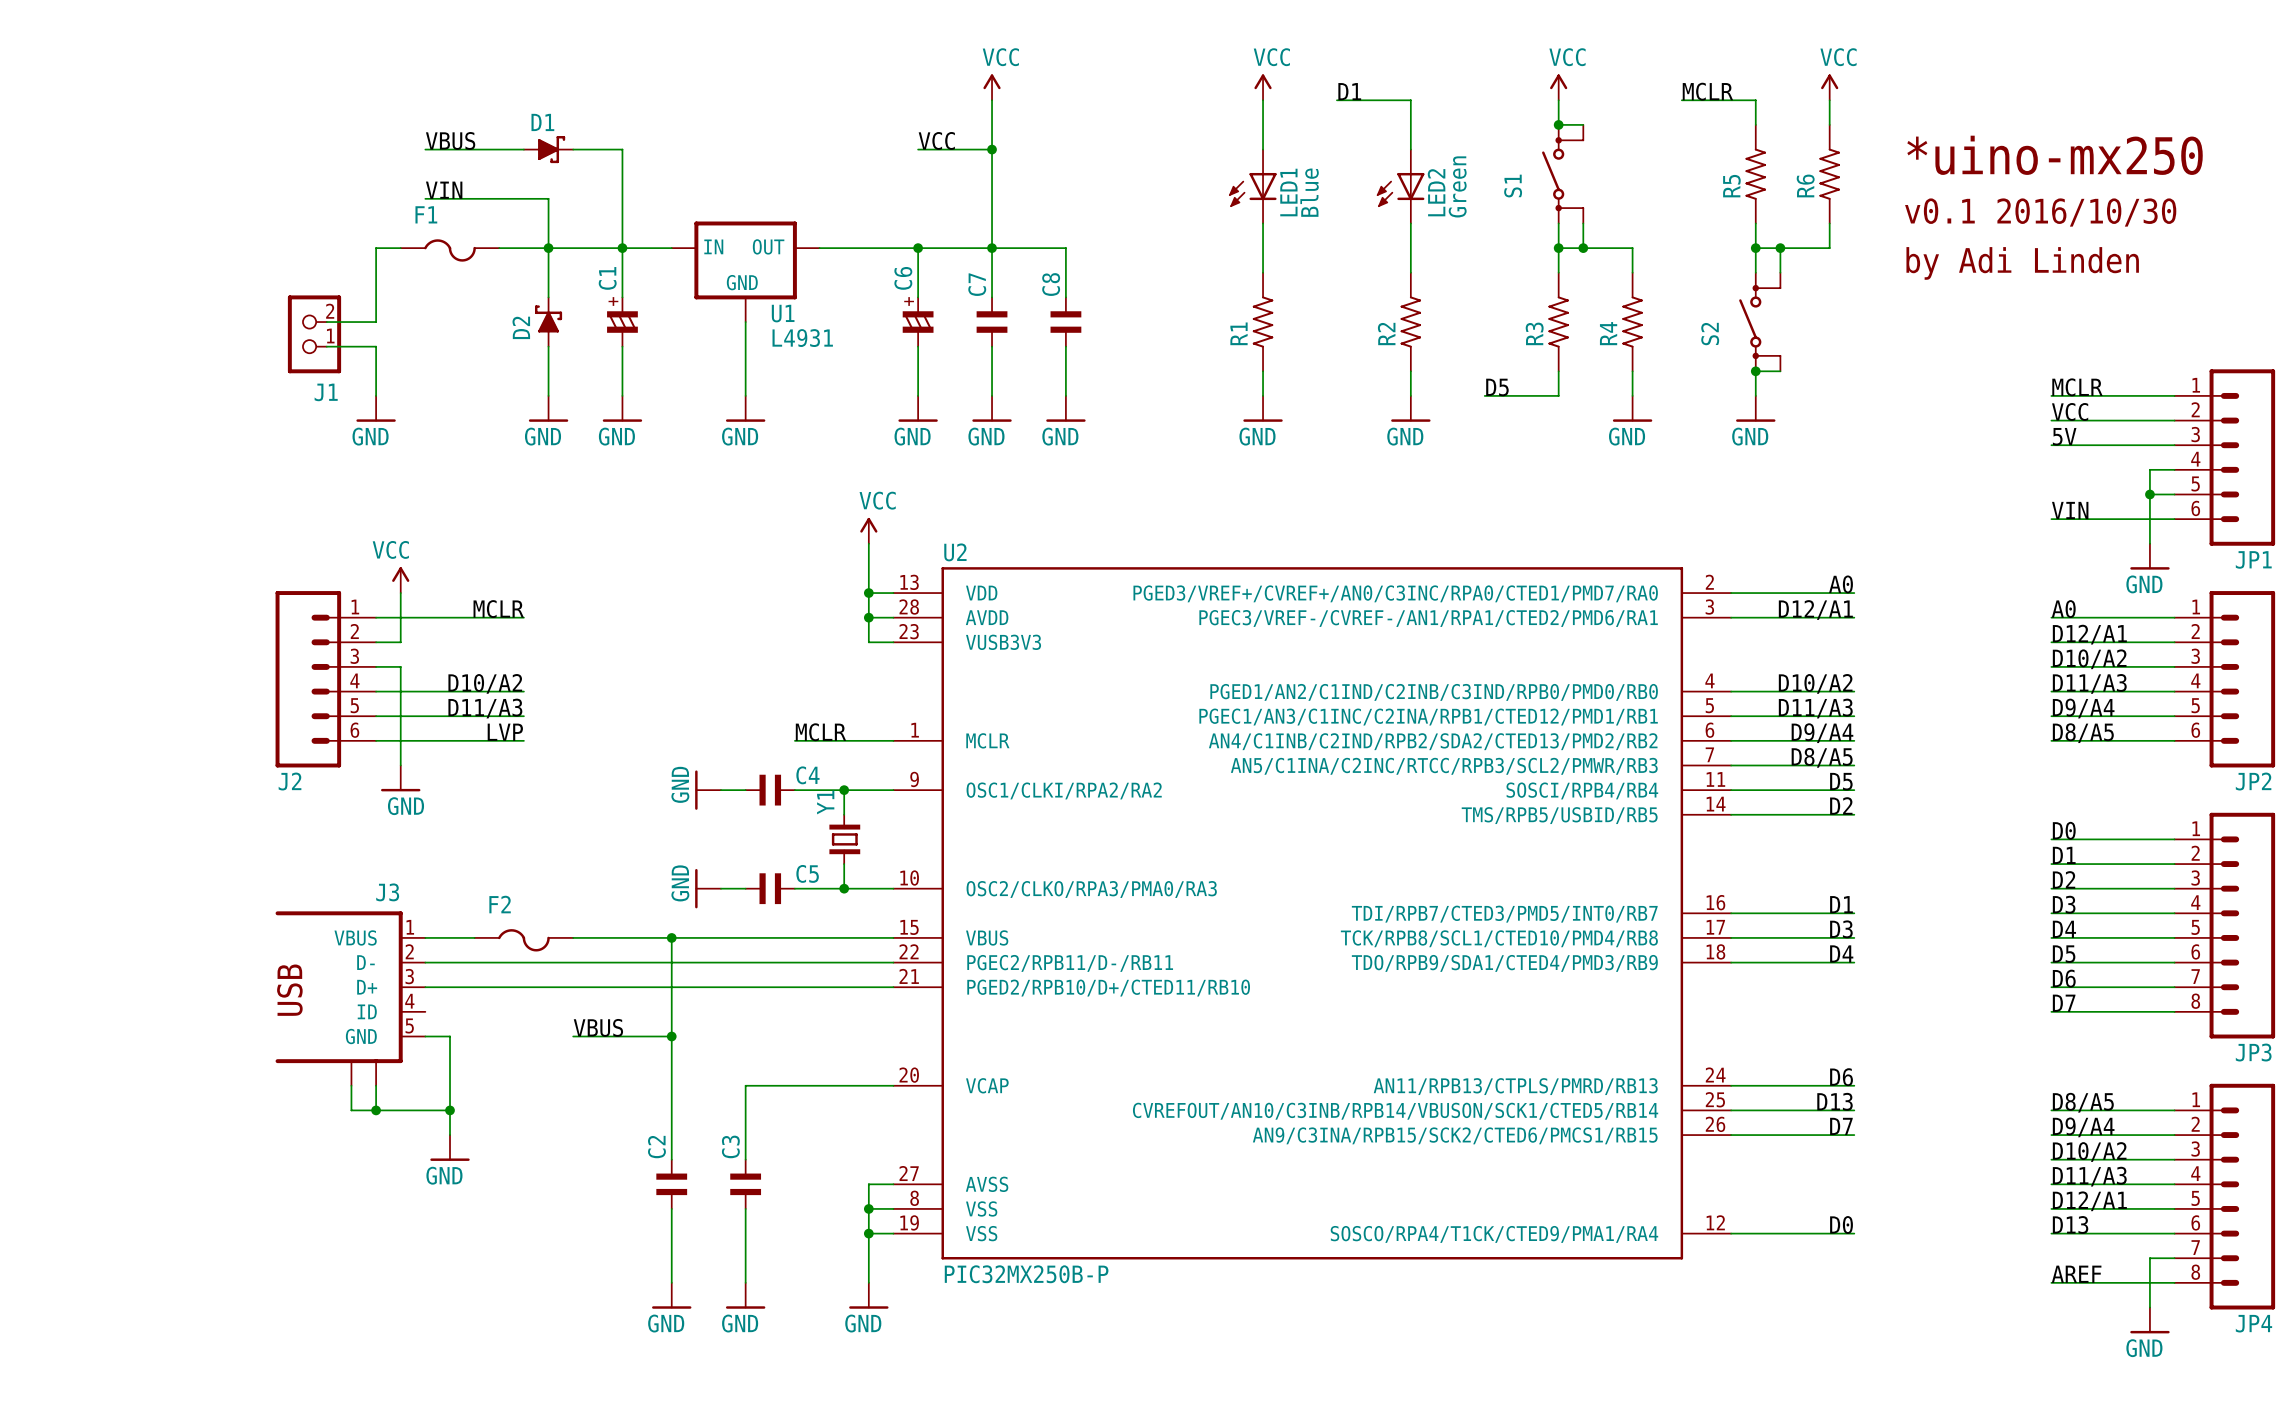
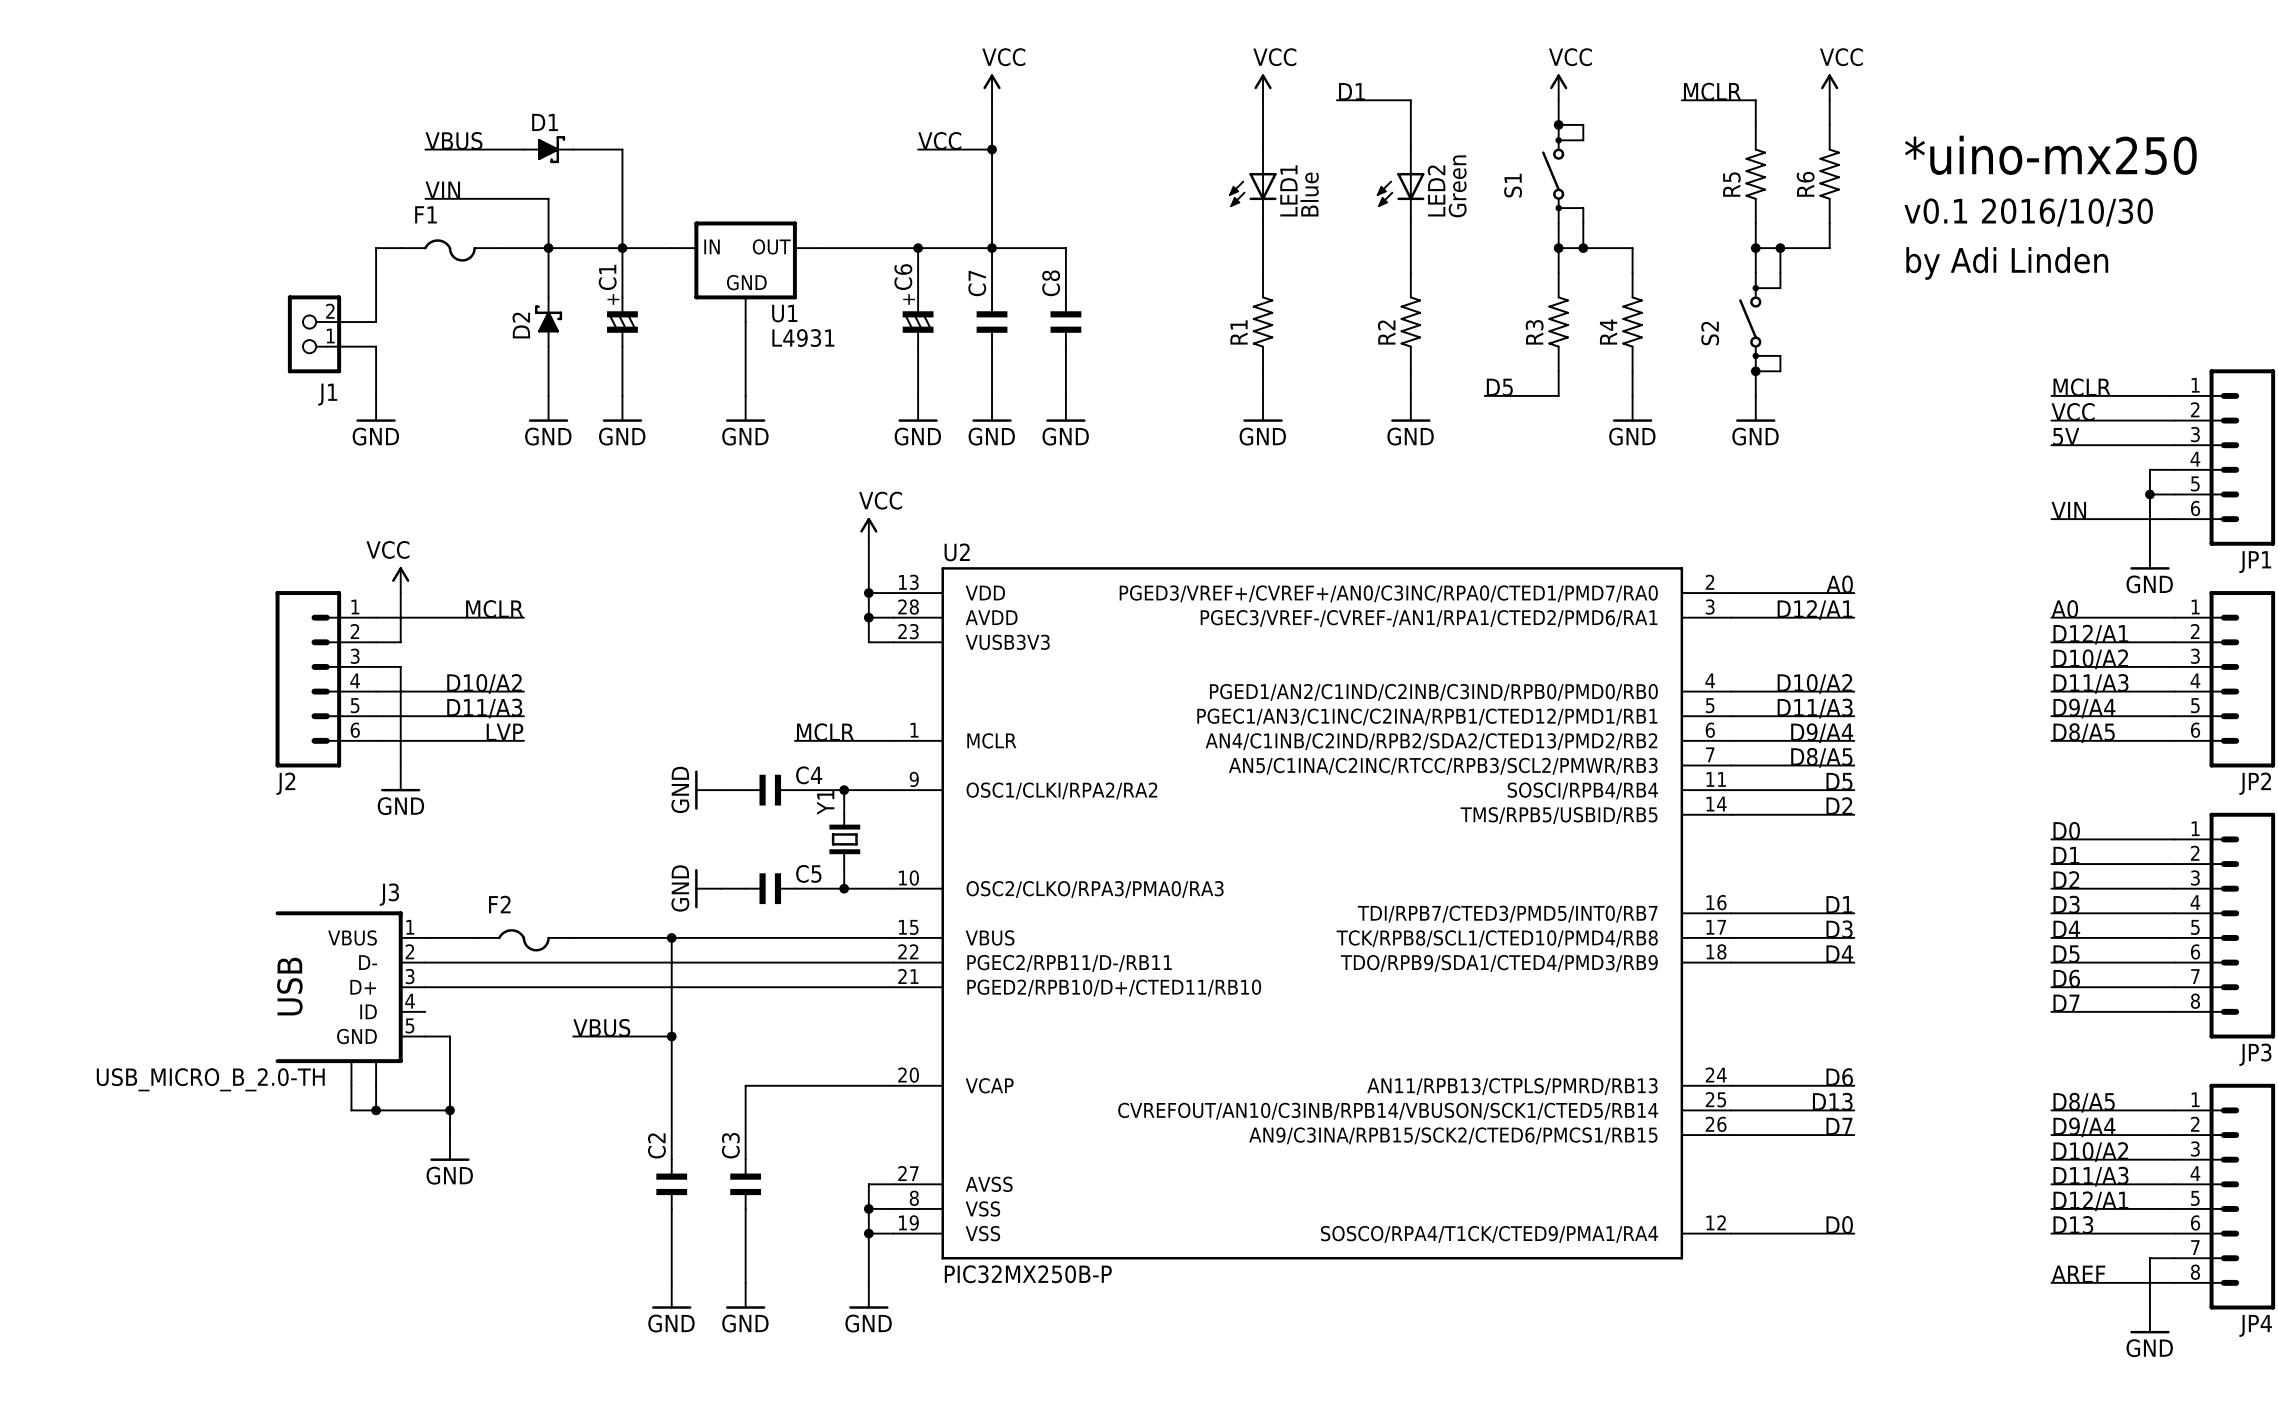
J3 symbol: [275, 911, 426, 1087] -> [275, 911, 426, 1086]
J3 value: none -> USB_MICRO_B_2.0-TH (210, 1079)

